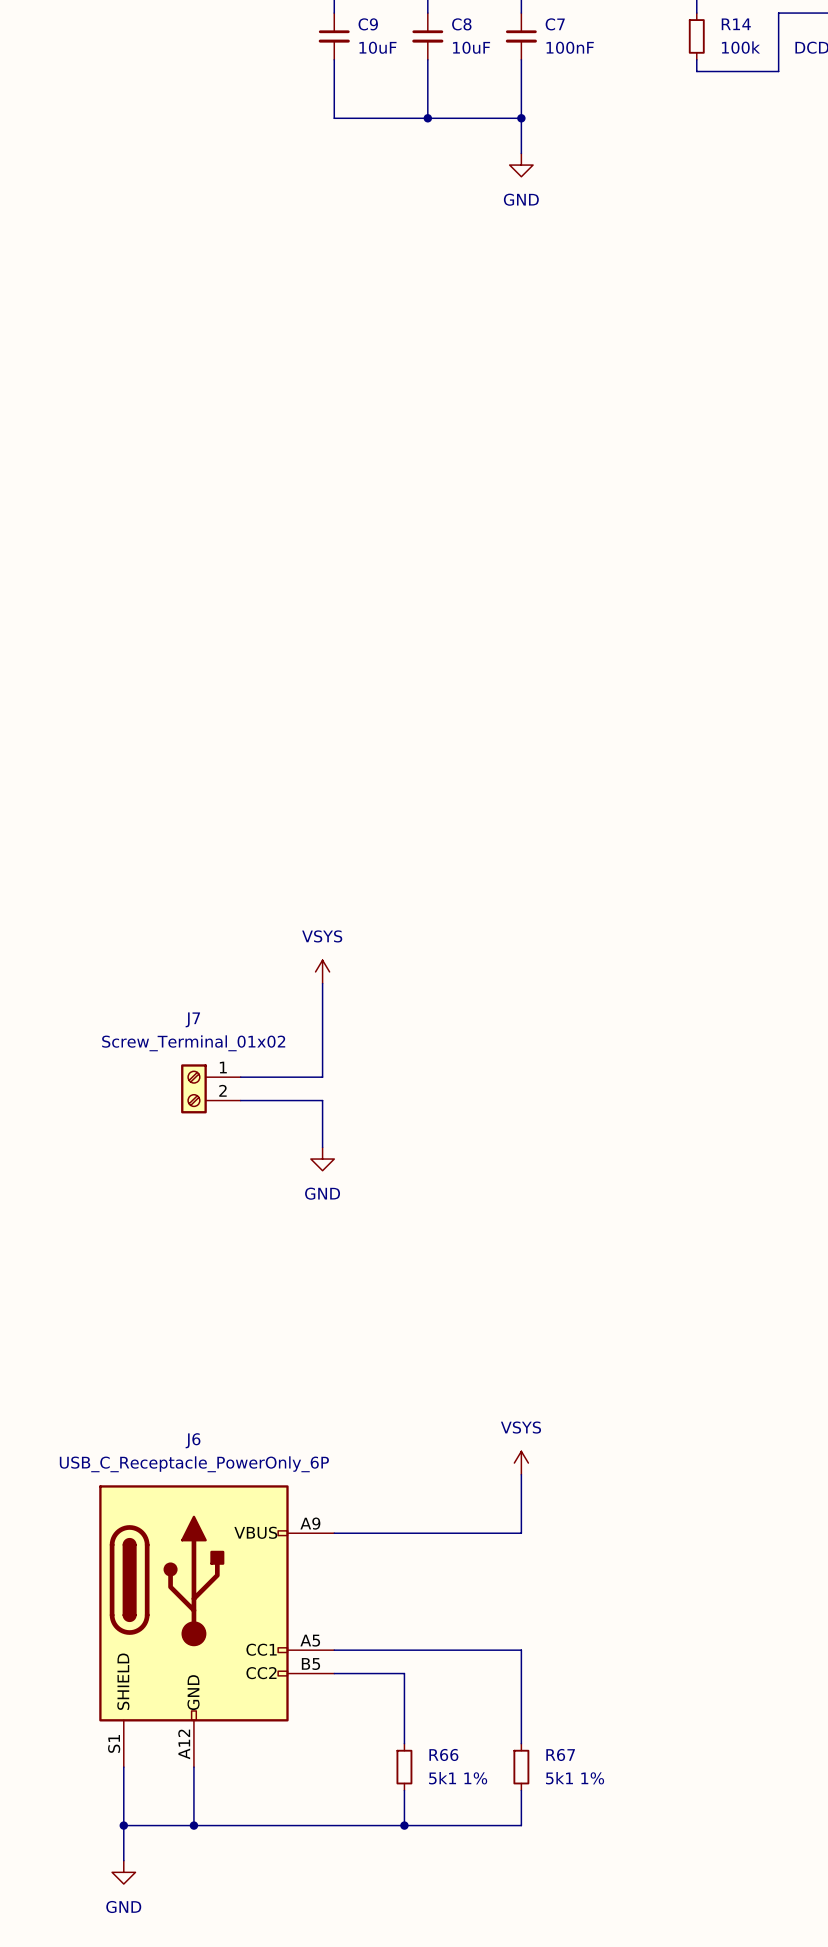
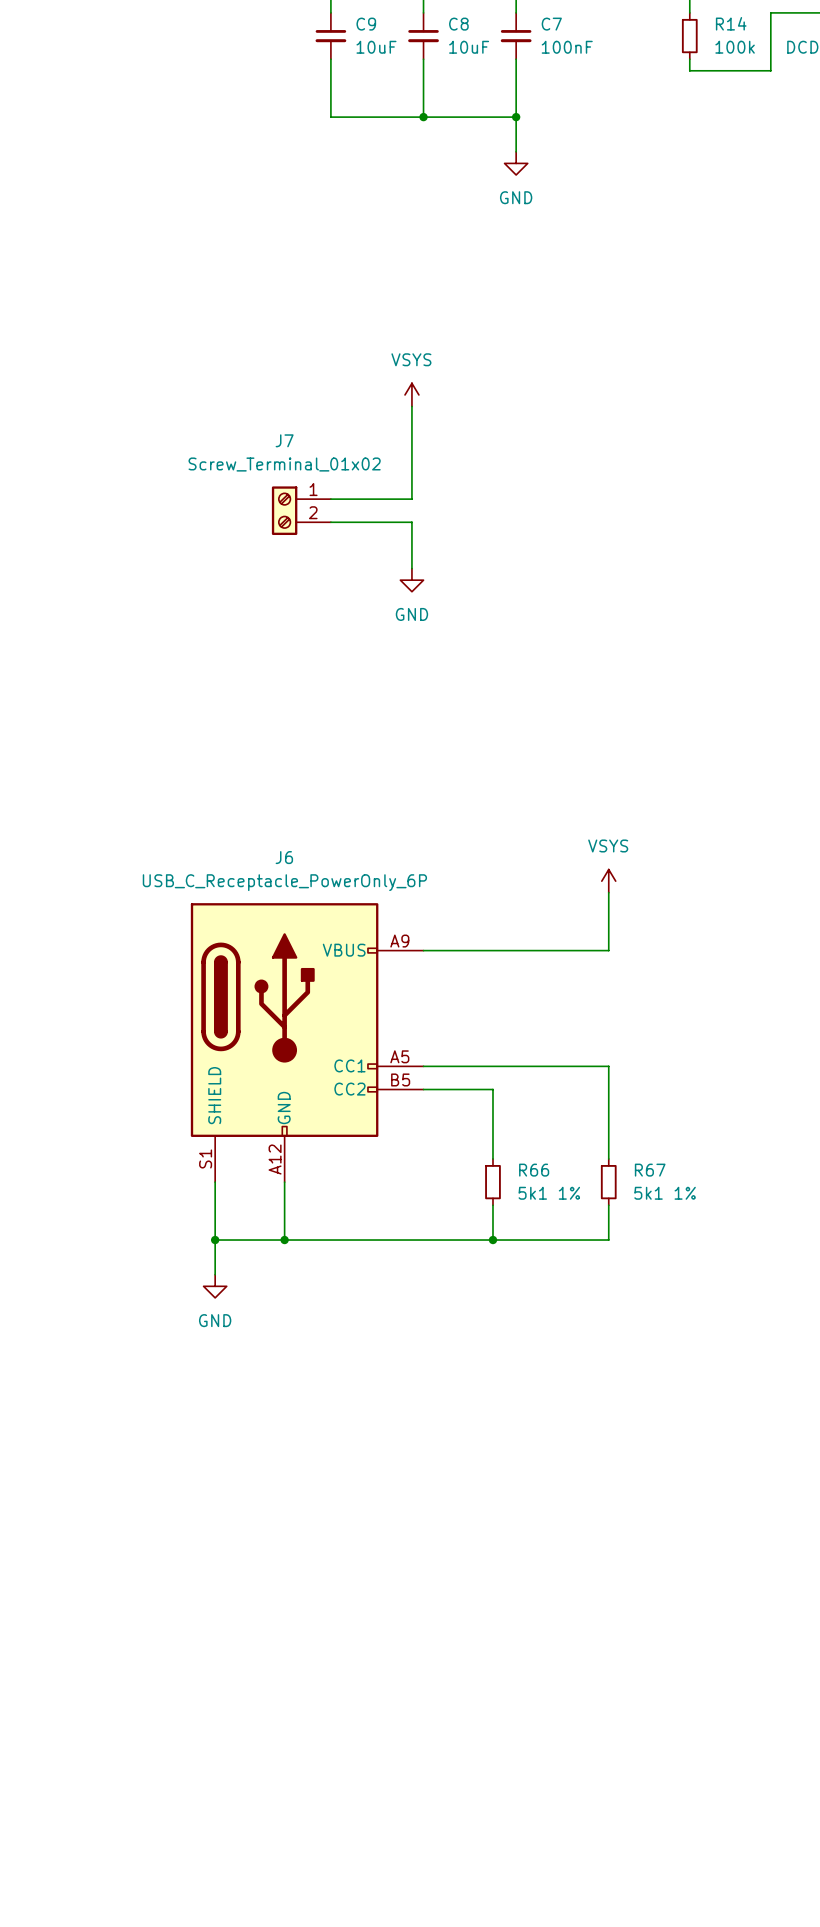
power symbol: none -> VSYS (411, 394)
wire: none -> (411, 406) (411, 499) (330, 499)
wire: none -> (330, 522) (411, 522) (411, 568)
power symbol: none -> GND (411, 580)
power symbol: none -> VSYS (608, 881)
wire: none -> (608, 892) (608, 950) (423, 950)
power symbol: VSYS (322, 971) -> none
wire: none -> (423, 1066) (608, 1066) (608, 1158)
J7 position: (210, 1088) -> (301, 510)
wire: none -> (423, 1089) (492, 1089) (492, 1158)
power symbol position: GND (322, 1159) -> GND (215, 1286)
wire: none -> (215, 1182) (215, 1274)
wire: none -> (284, 1182) (284, 1240)
wire: none -> (492, 1205) (492, 1240)
wire: none -> (608, 1205) (608, 1240) (215, 1240)
junction: none -> (215, 1240)
junction: none -> (284, 1240)
junction: none -> (492, 1240)
power symbol: VSYS (521, 1463) -> none
wire: (521, 1474) (521, 1533) (334, 1533) -> none
J6 position: (216, 1626) -> (307, 1042)
wire: (334, 1650) (521, 1650) (521, 1743) -> none
wire: (334, 1673) (404, 1673) (404, 1743) -> none
wire: (123, 1767) (123, 1860) -> none
wire: (193, 1767) (193, 1825) -> none
R66 position: (404, 1767) -> (492, 1182)
R67 position: (521, 1767) -> (608, 1182)
wire: (404, 1790) (404, 1825) -> none
wire: (521, 1790) (521, 1825) (123, 1825) -> none
junction: (123, 1825) -> none
junction: (193, 1825) -> none
junction: (404, 1825) -> none
power symbol: GND (123, 1872) -> none

